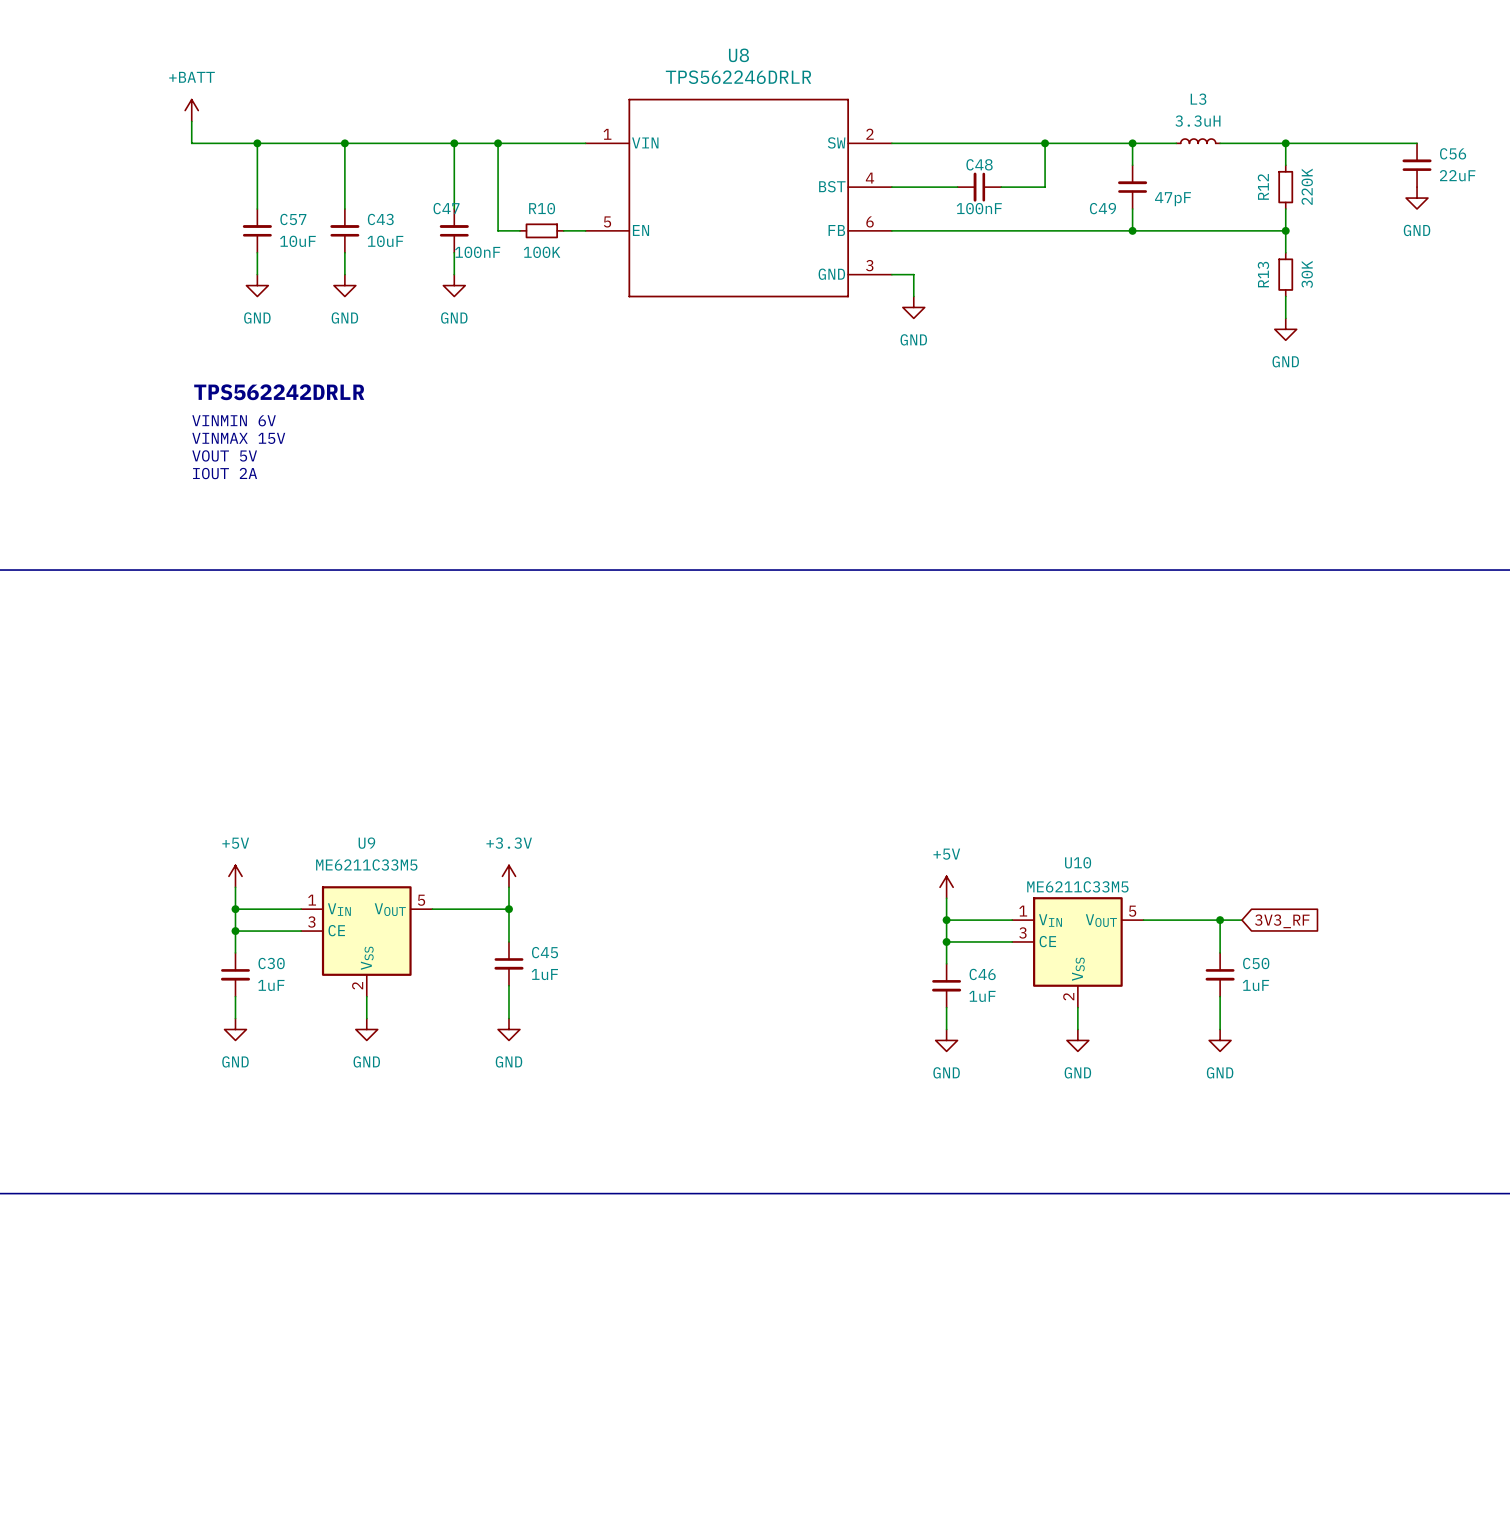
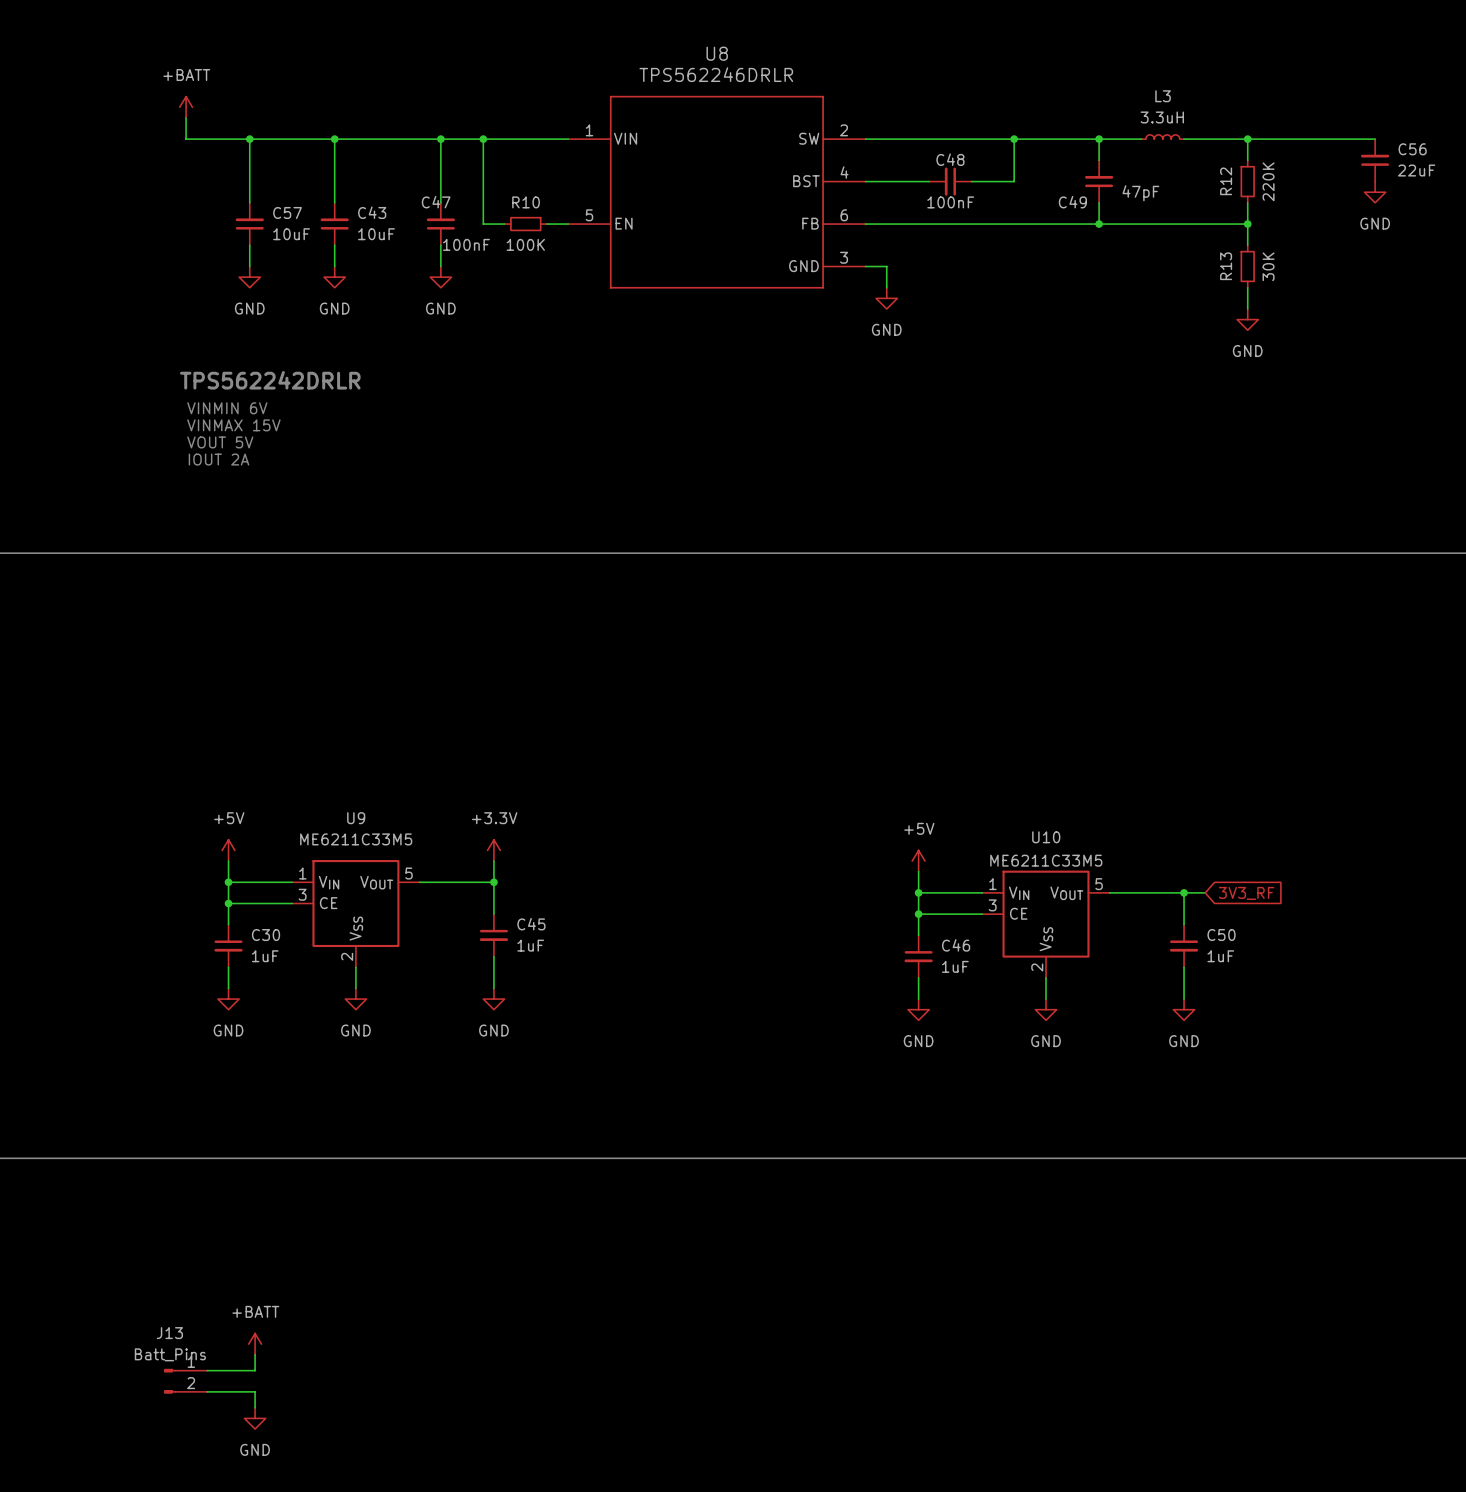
power symbol: none -> +BATT (255, 1344)
wire: none -> (255, 1354) (255, 1370) (207, 1370)
J13: none -> Batt_Pins (185, 1381)
wire: none -> (207, 1391) (255, 1391) (255, 1407)
power symbol: none -> GND (255, 1418)

